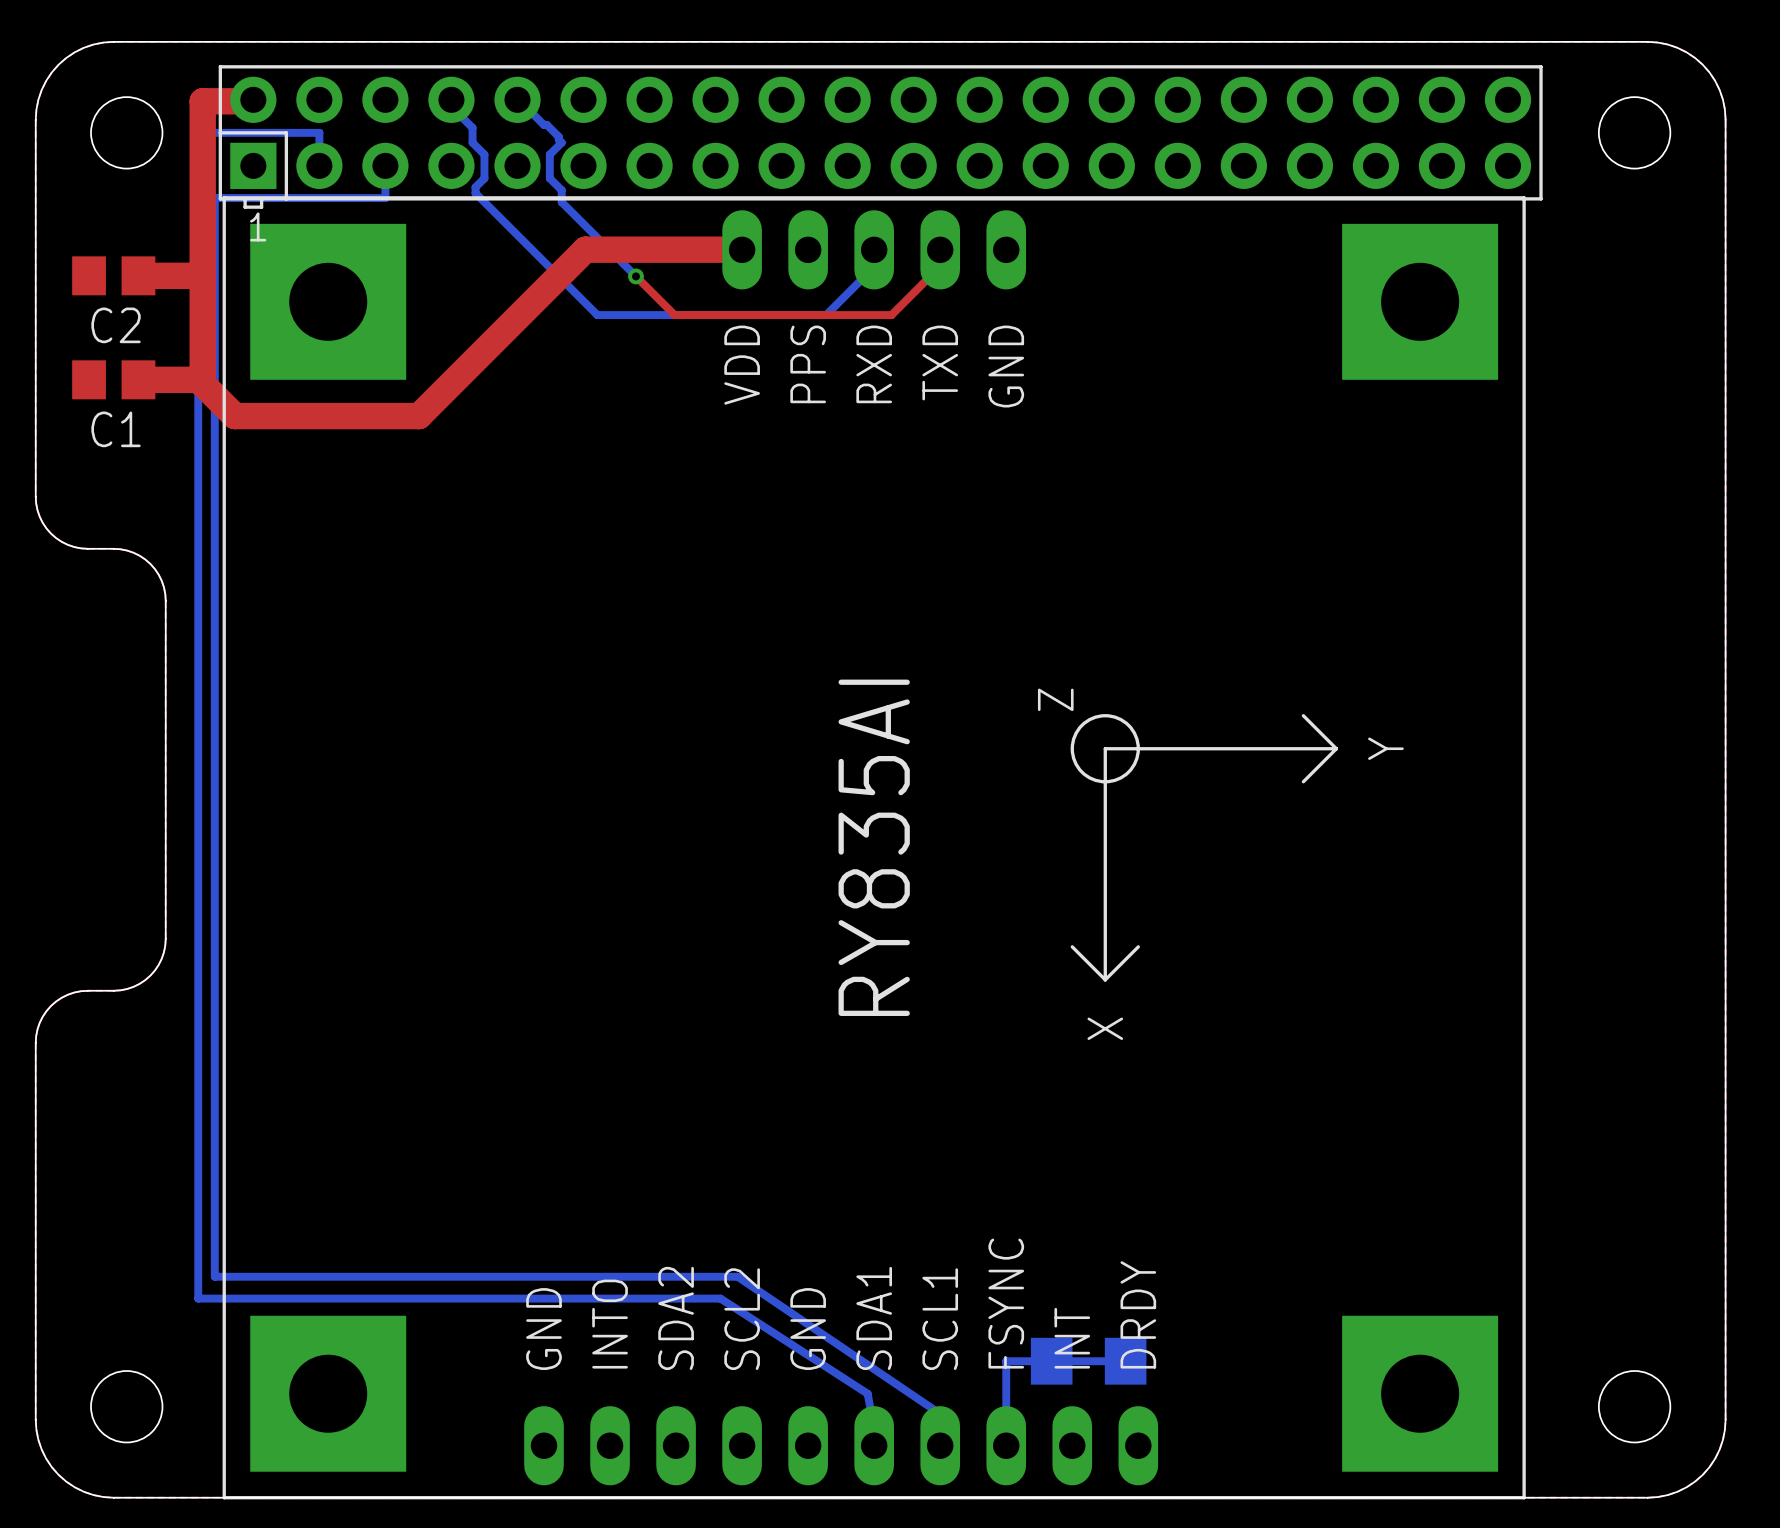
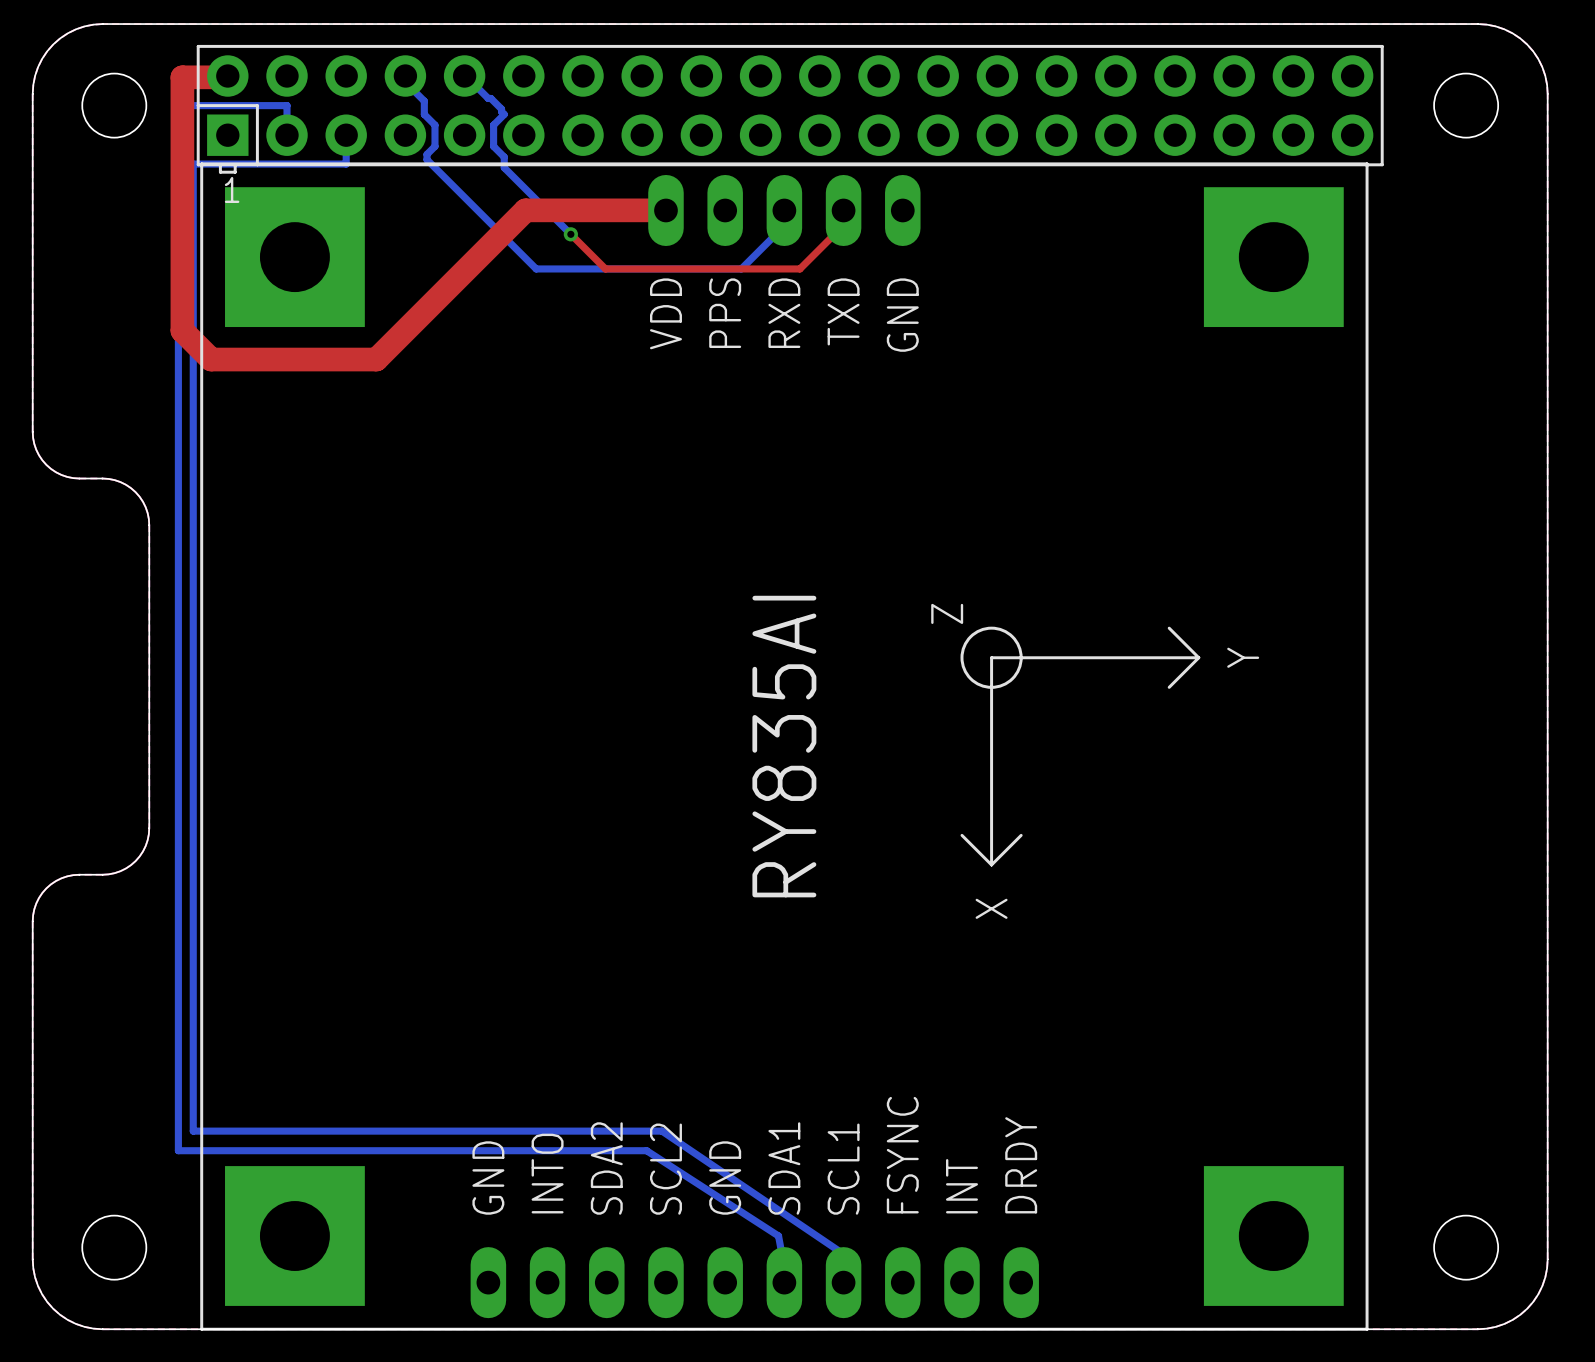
C2: (113, 275) -> none
top track: (138, 275) (202, 275) -> none
C1: (113, 379) -> none
top track: (138, 379) (202, 379) -> none
bottom track: (1051, 1361) (1006, 1361) (1006, 1445) -> none
part: (1088, 1361) -> none

